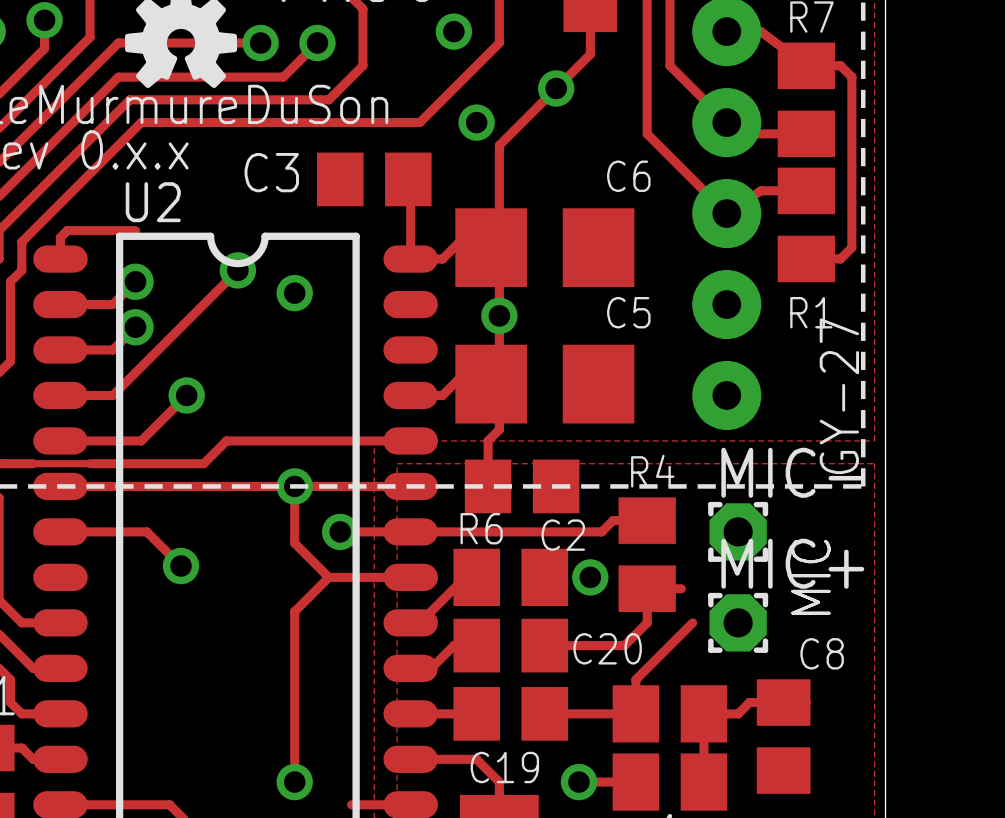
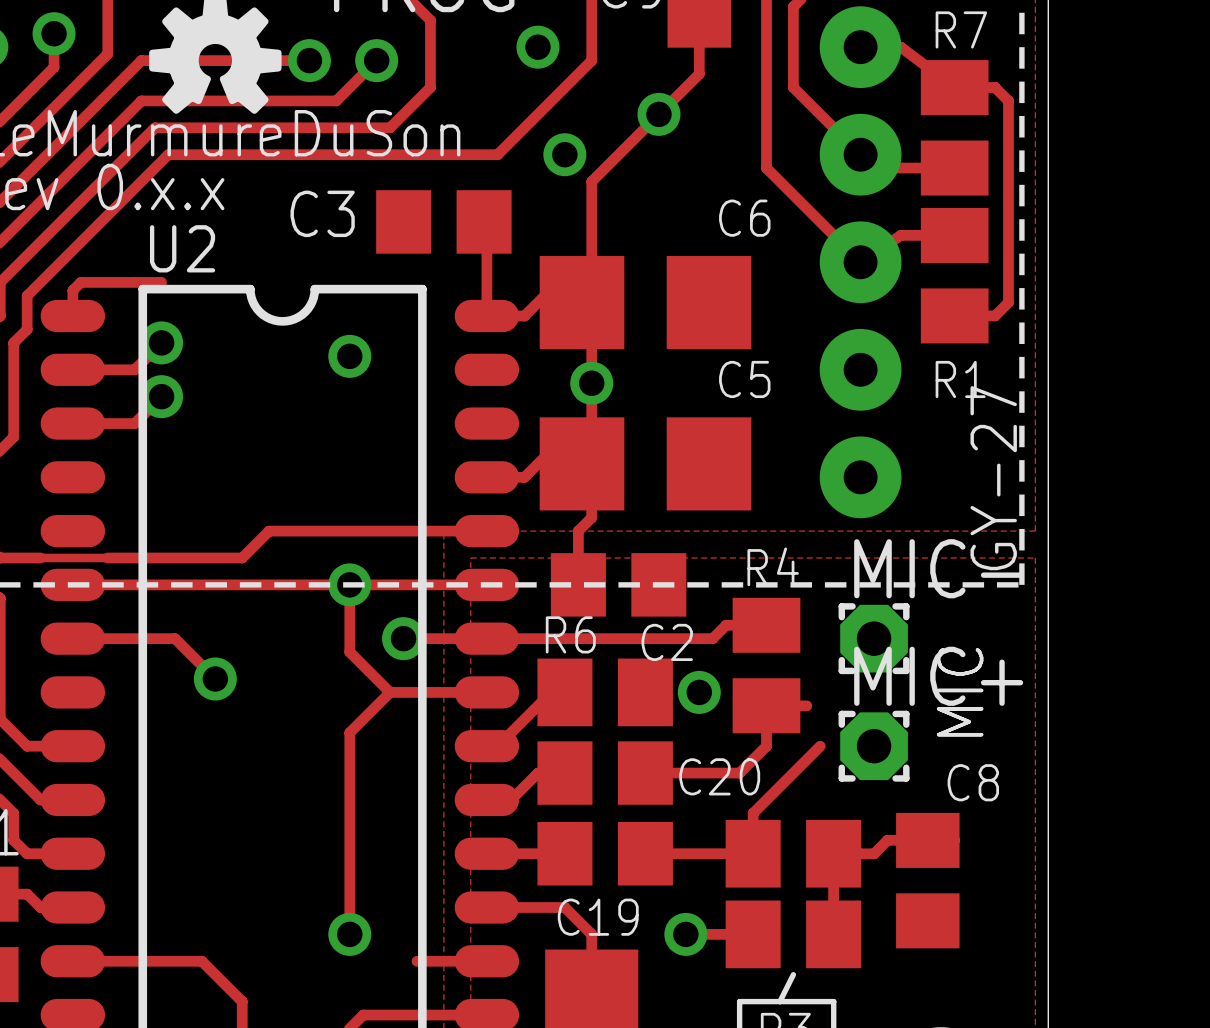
track: (237, 270) (112, 395) (60, 395) -> none
via: (237, 270) -> none
track: (186, 395) (141, 440) (60, 440) -> none
via: (186, 395) -> none

